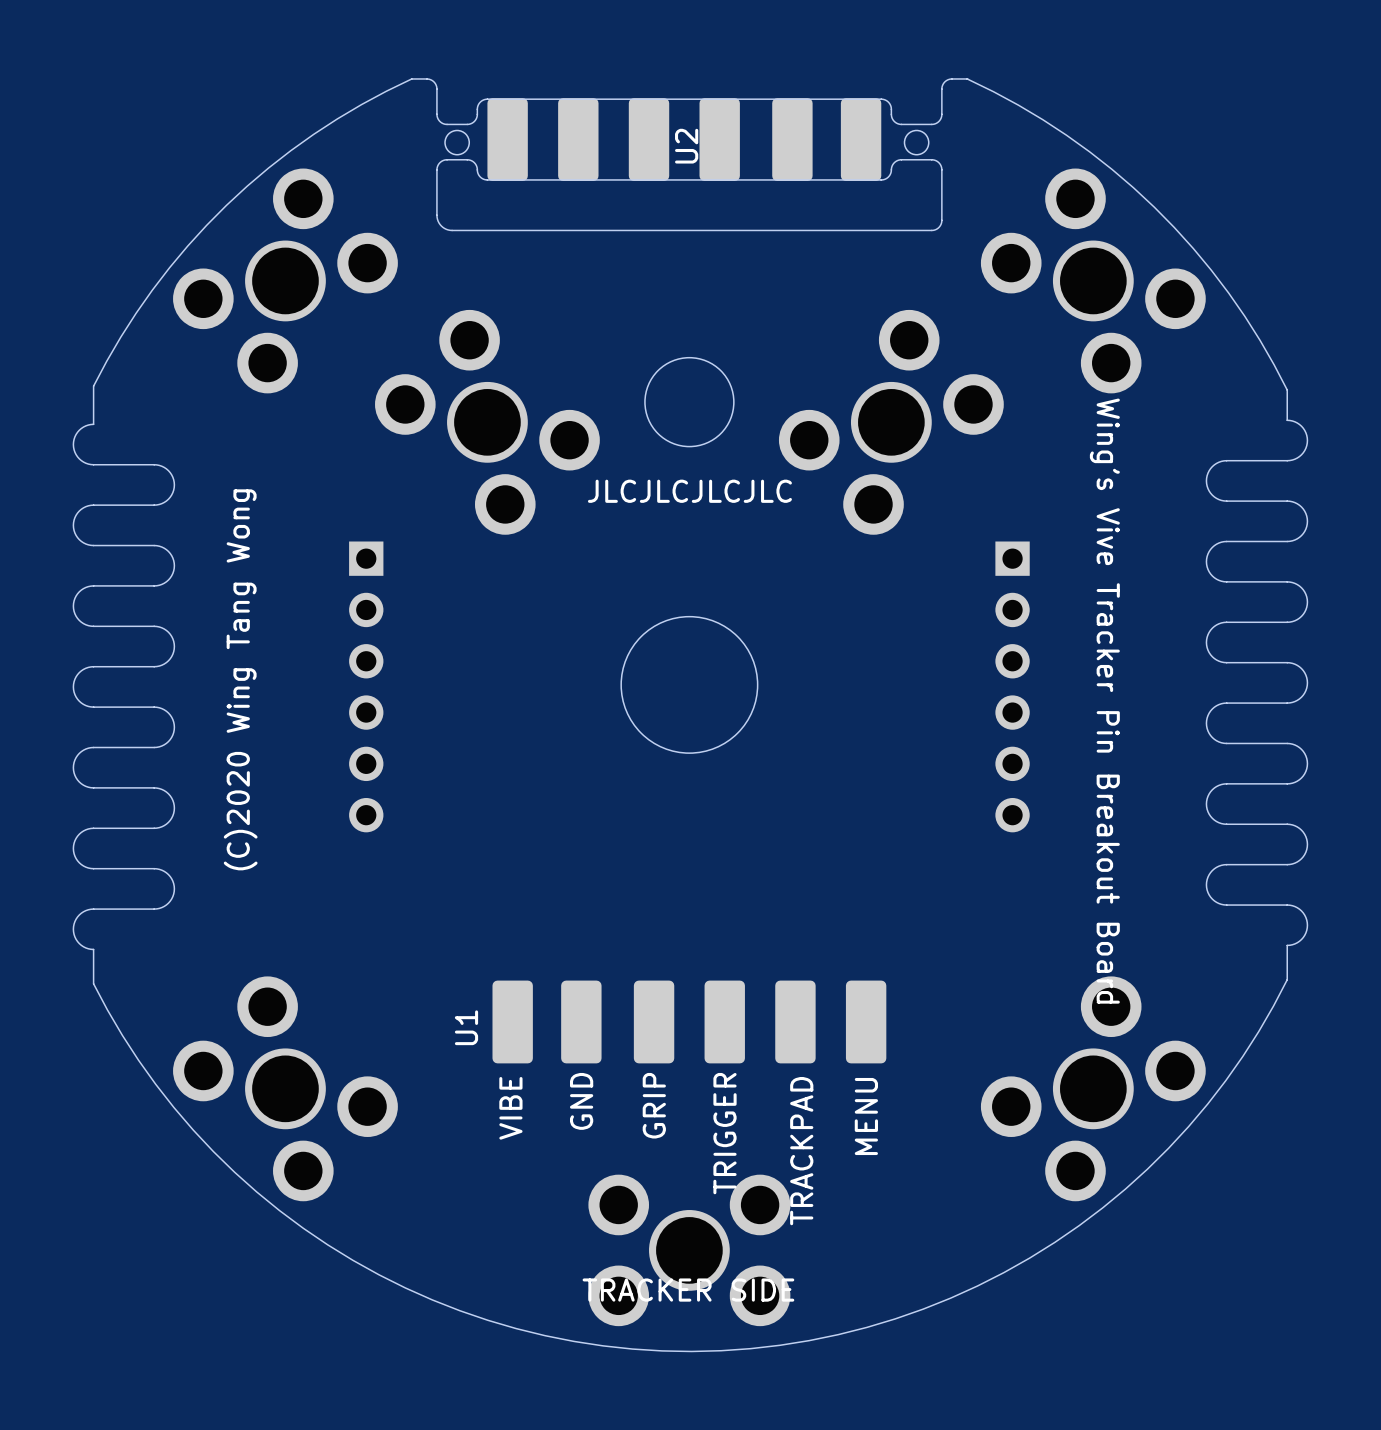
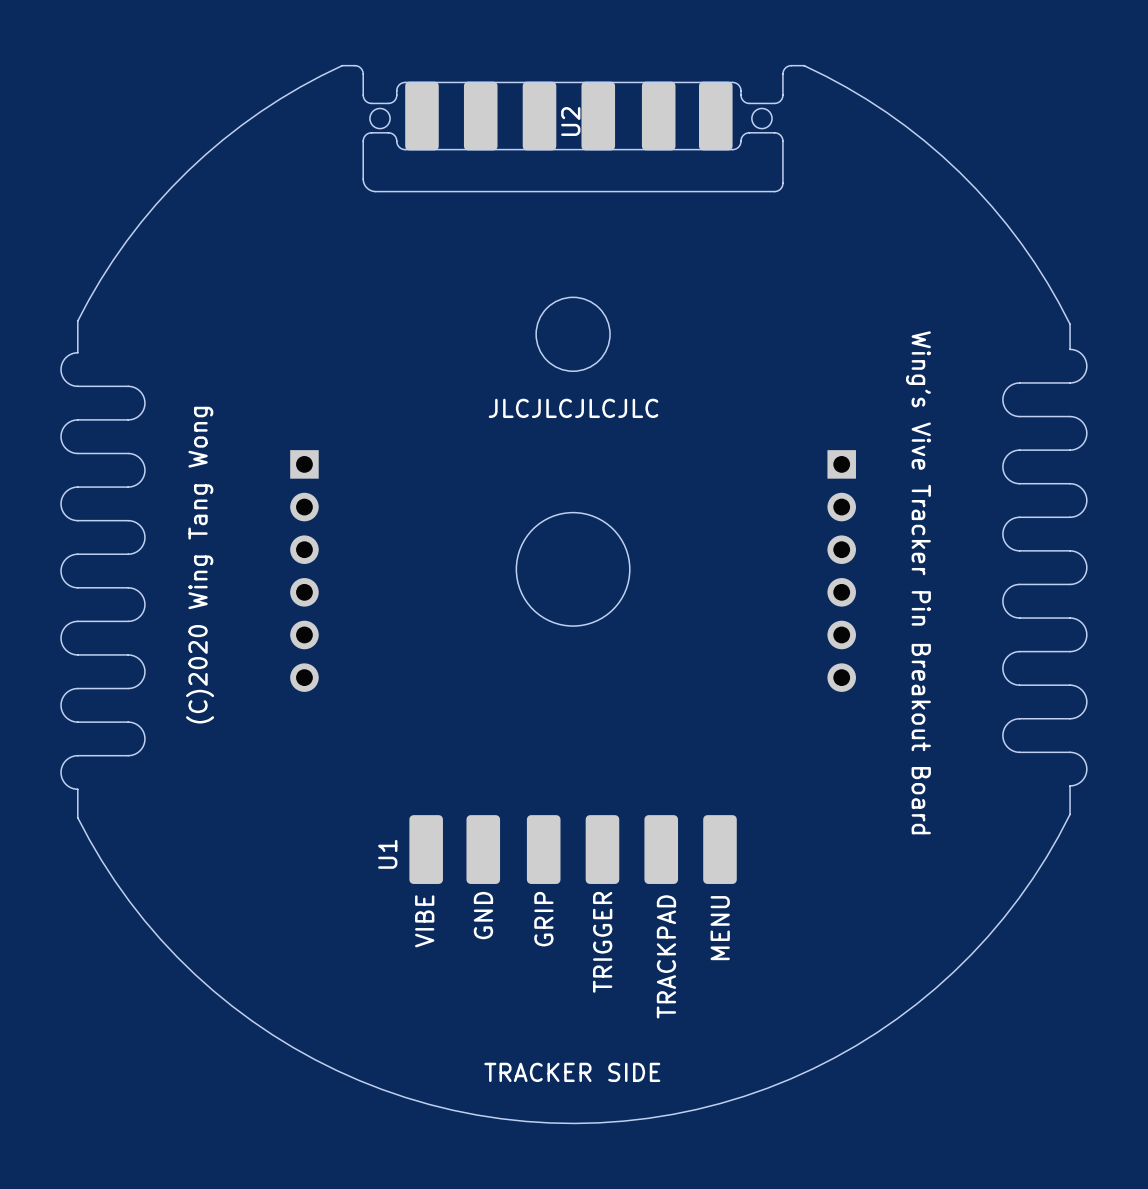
part: (285, 280) -> none
part: (1093, 280) -> none
part: (487, 422) -> none
part: (891, 422) -> none
part: (285, 1088) -> none
part: (1093, 1088) -> none
part: (689, 1250) -> none

